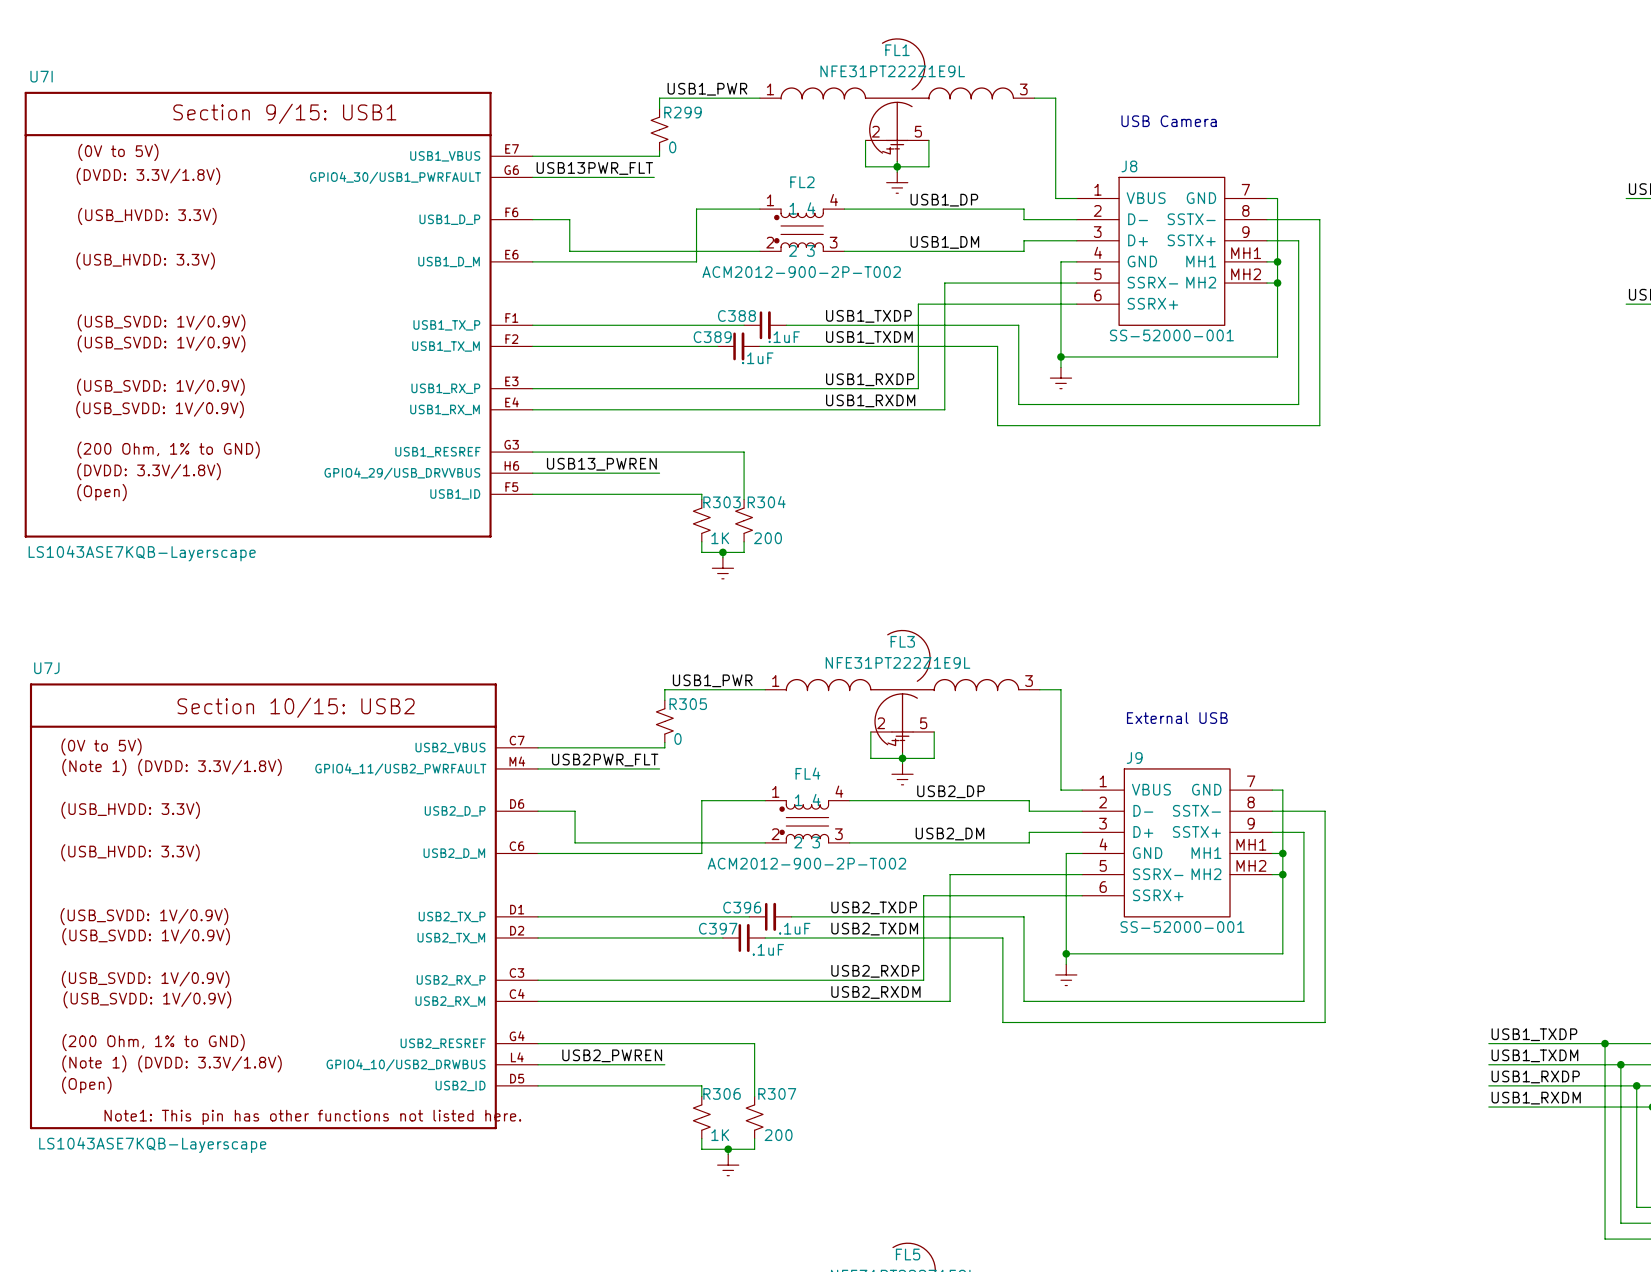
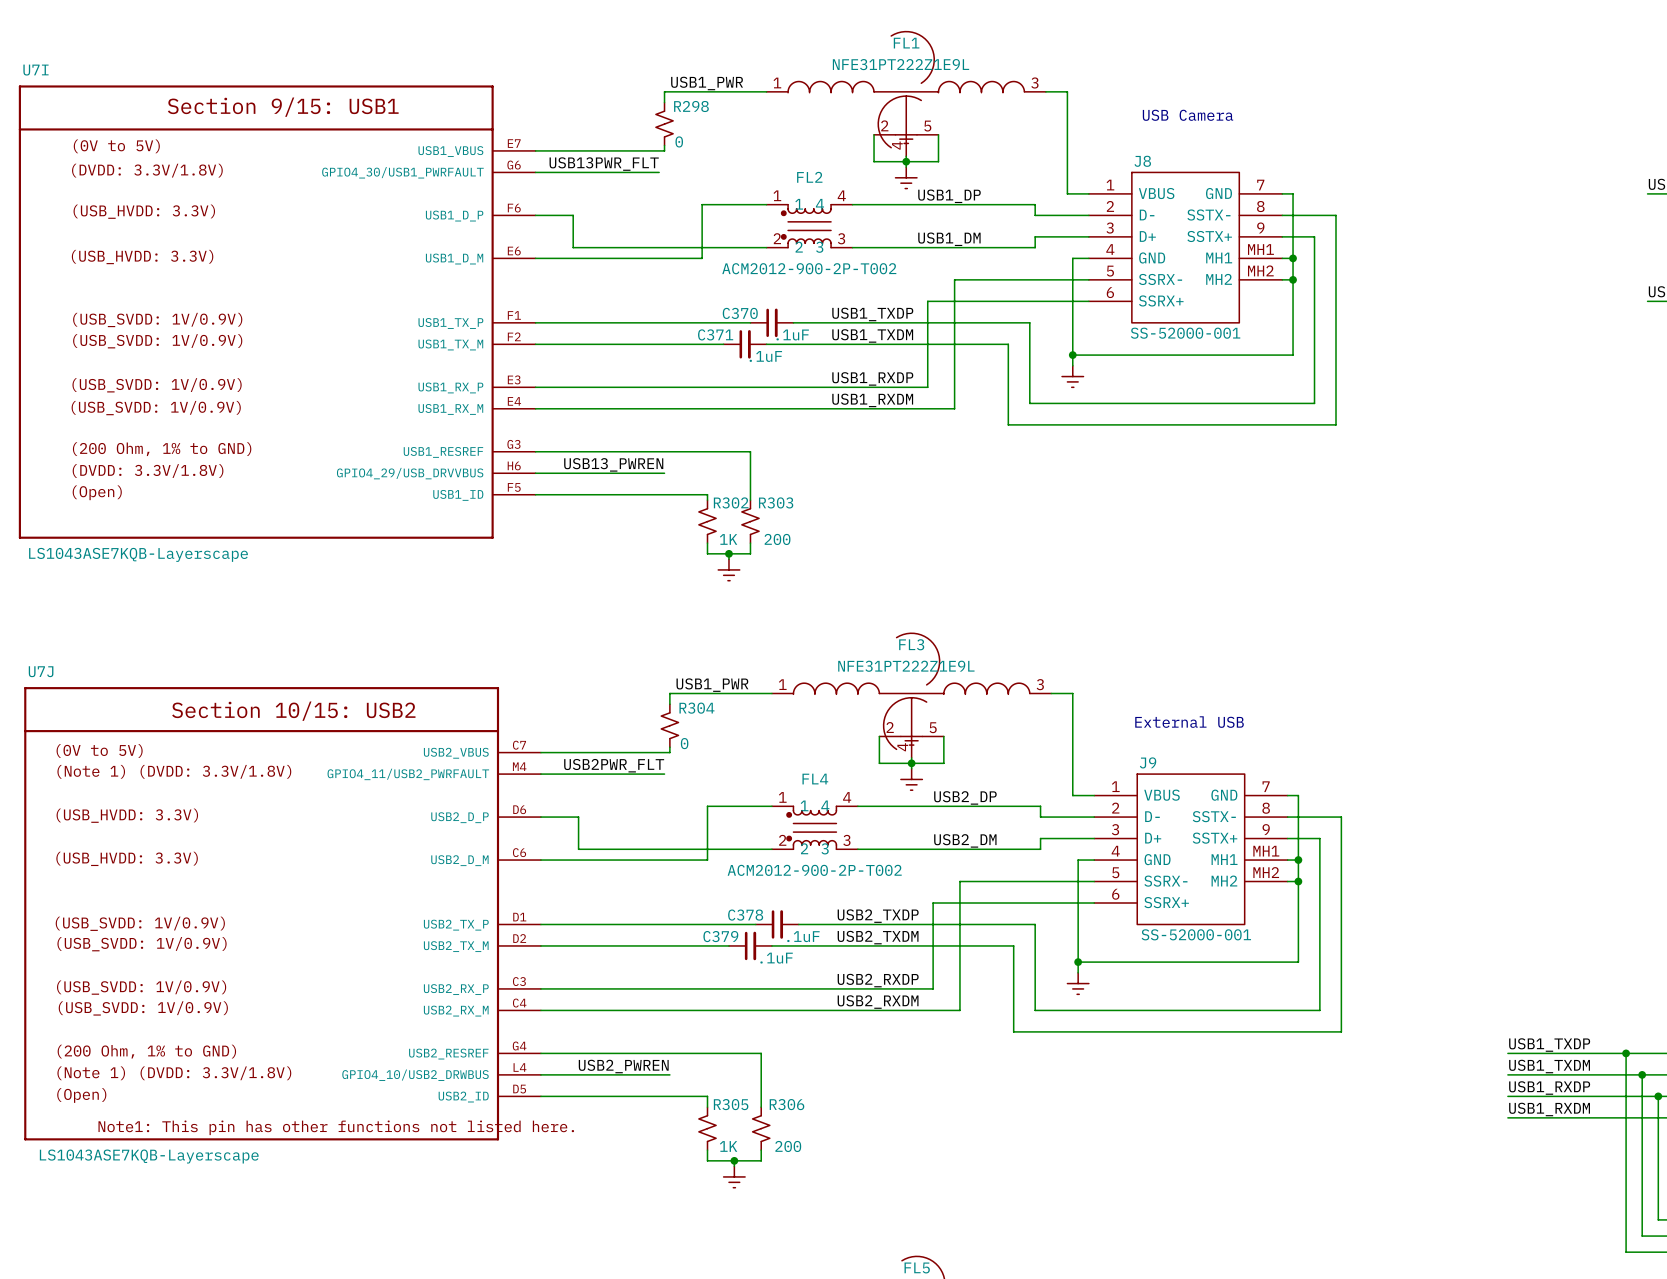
R299 name: R299 (682, 112) -> R298 (691, 106)
C388 name: C388 (736, 316) -> C370 (740, 313)
C389 name: C389 (712, 337) -> C371 (715, 334)
R303 name: R303 (722, 502) -> R302 (731, 502)
R304 name: R304 (766, 502) -> R303 (776, 502)
R305 name: R305 (688, 704) -> R304 (696, 708)
C396 name: C396 (742, 907) -> C378 (745, 915)
C397 name: C397 (718, 928) -> C379 (720, 936)
R306 name: R306 (722, 1093) -> R305 (731, 1104)
R307 name: R307 (777, 1093) -> R306 (786, 1104)

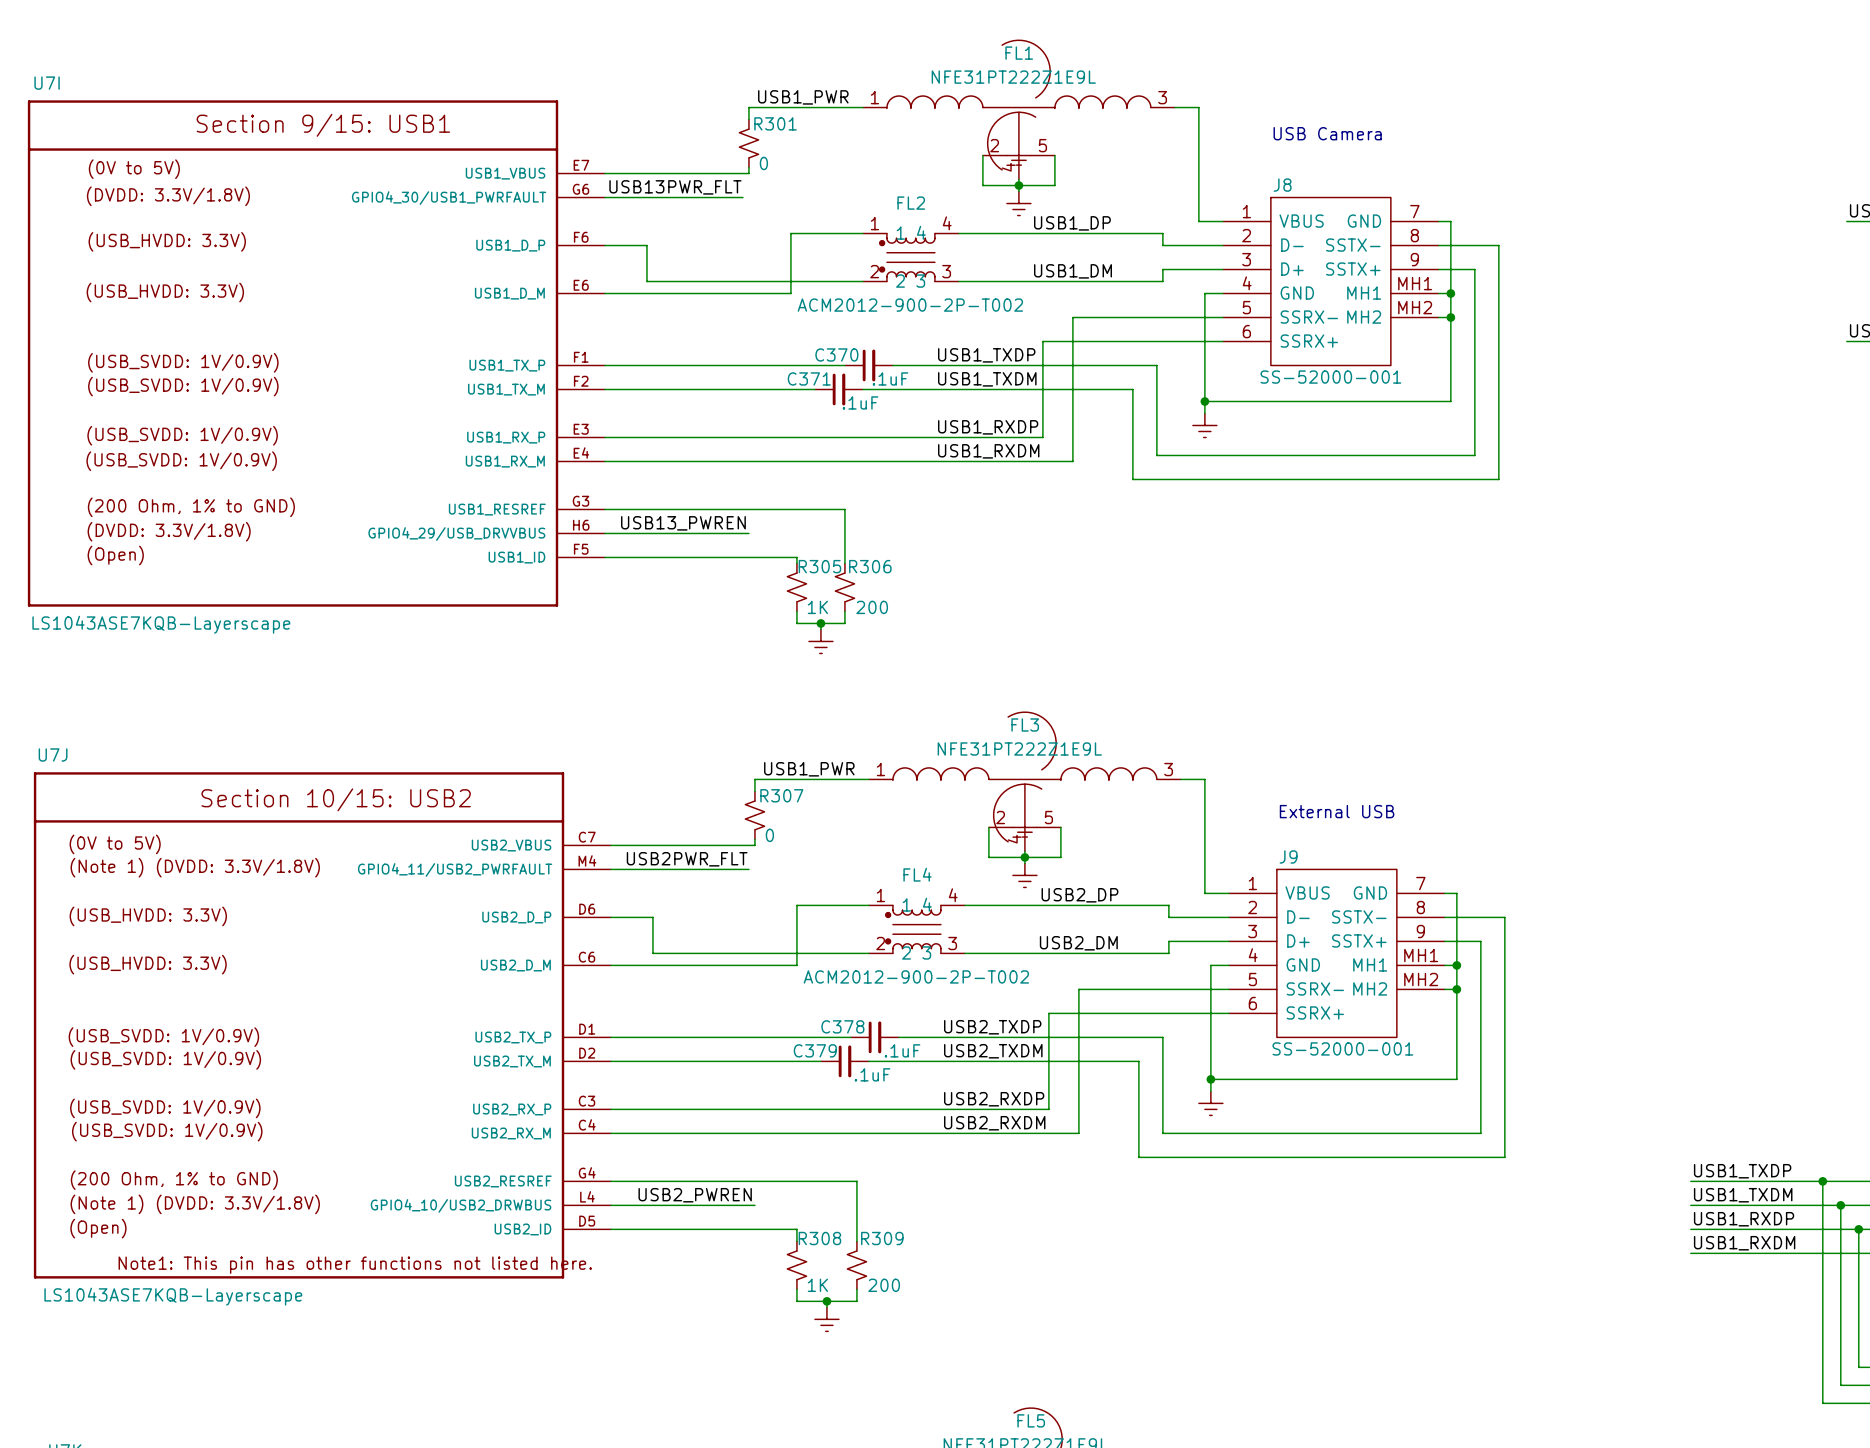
R298 name: R298 (691, 106) -> R301 (775, 123)
R302 name: R302 (731, 502) -> R305 (819, 566)
R303 name: R303 (776, 502) -> R306 (870, 566)
R304 name: R304 (696, 708) -> R307 (781, 795)
R305 name: R305 (731, 1104) -> R308 (819, 1238)
R306 name: R306 (786, 1104) -> R309 (882, 1238)

